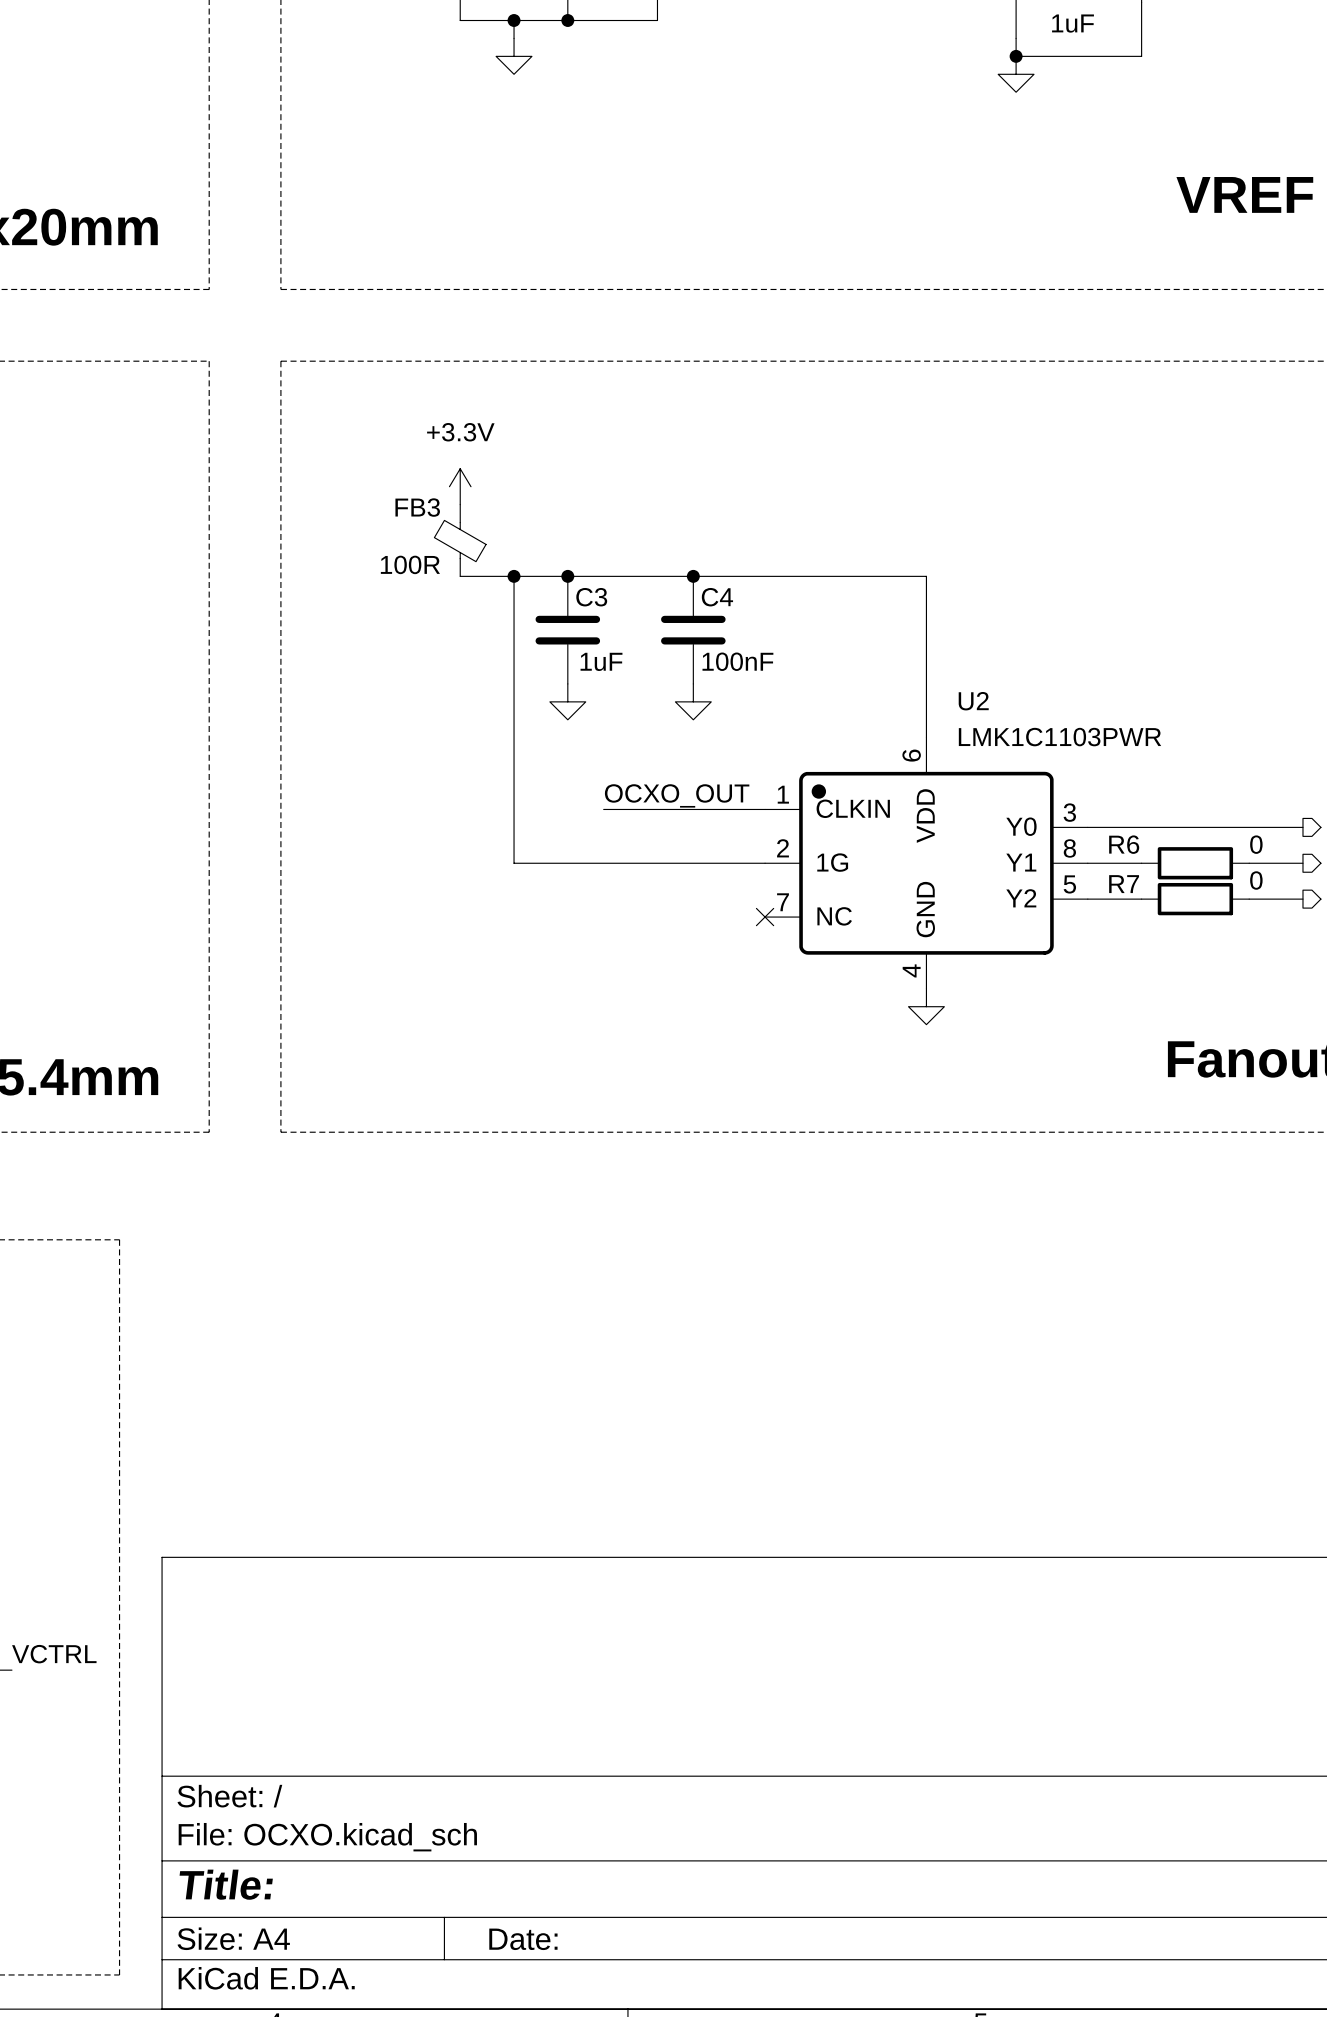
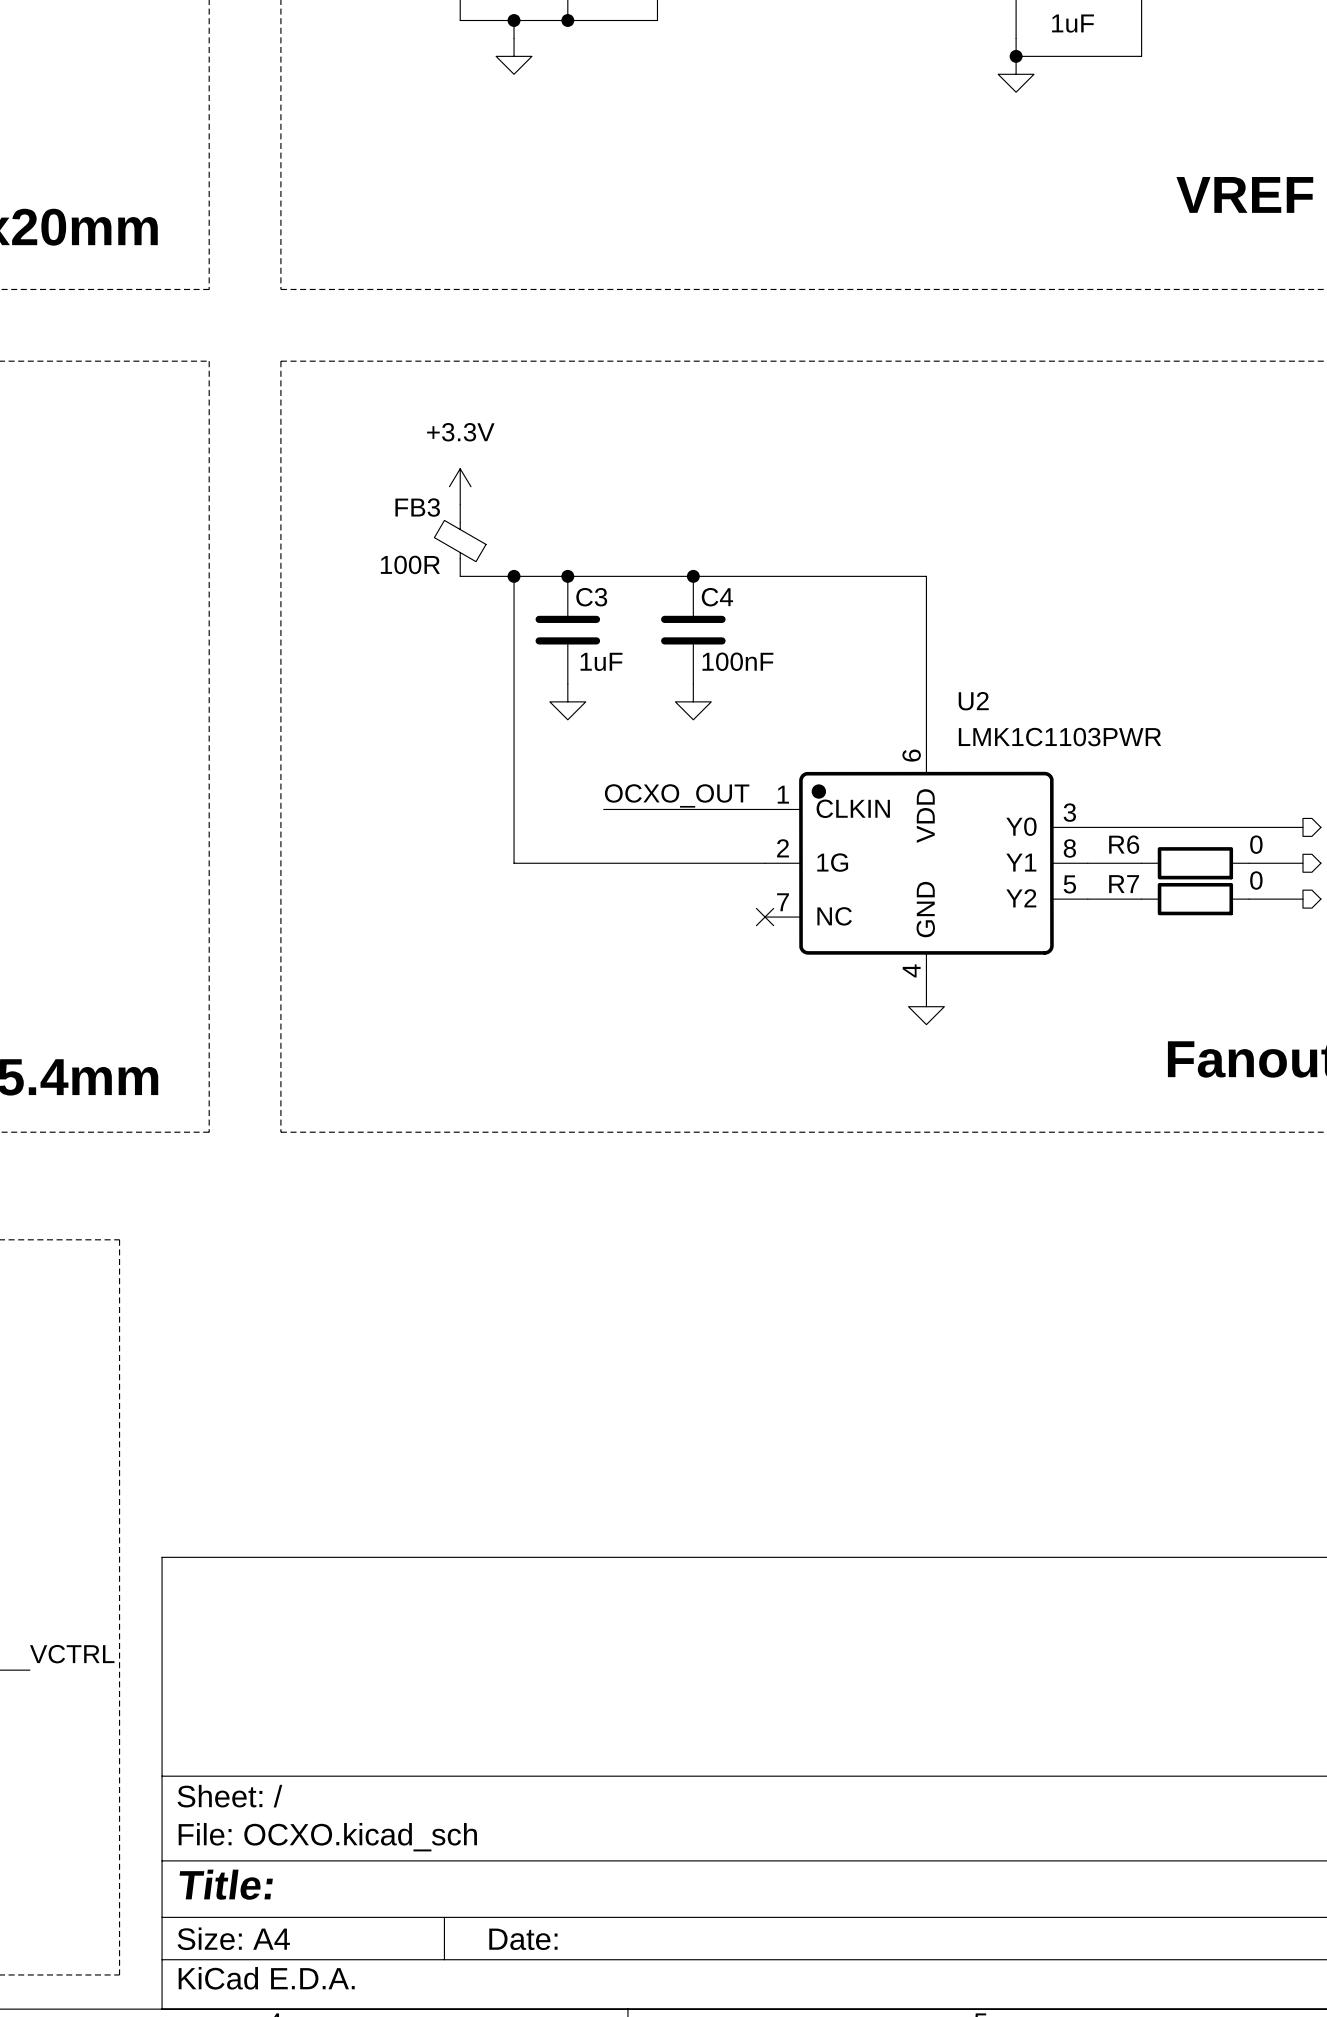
label position: VCTRL (54, 1654) -> VCTRL (72, 1654)
wire: none -> (11, 1670) (29, 1670)

